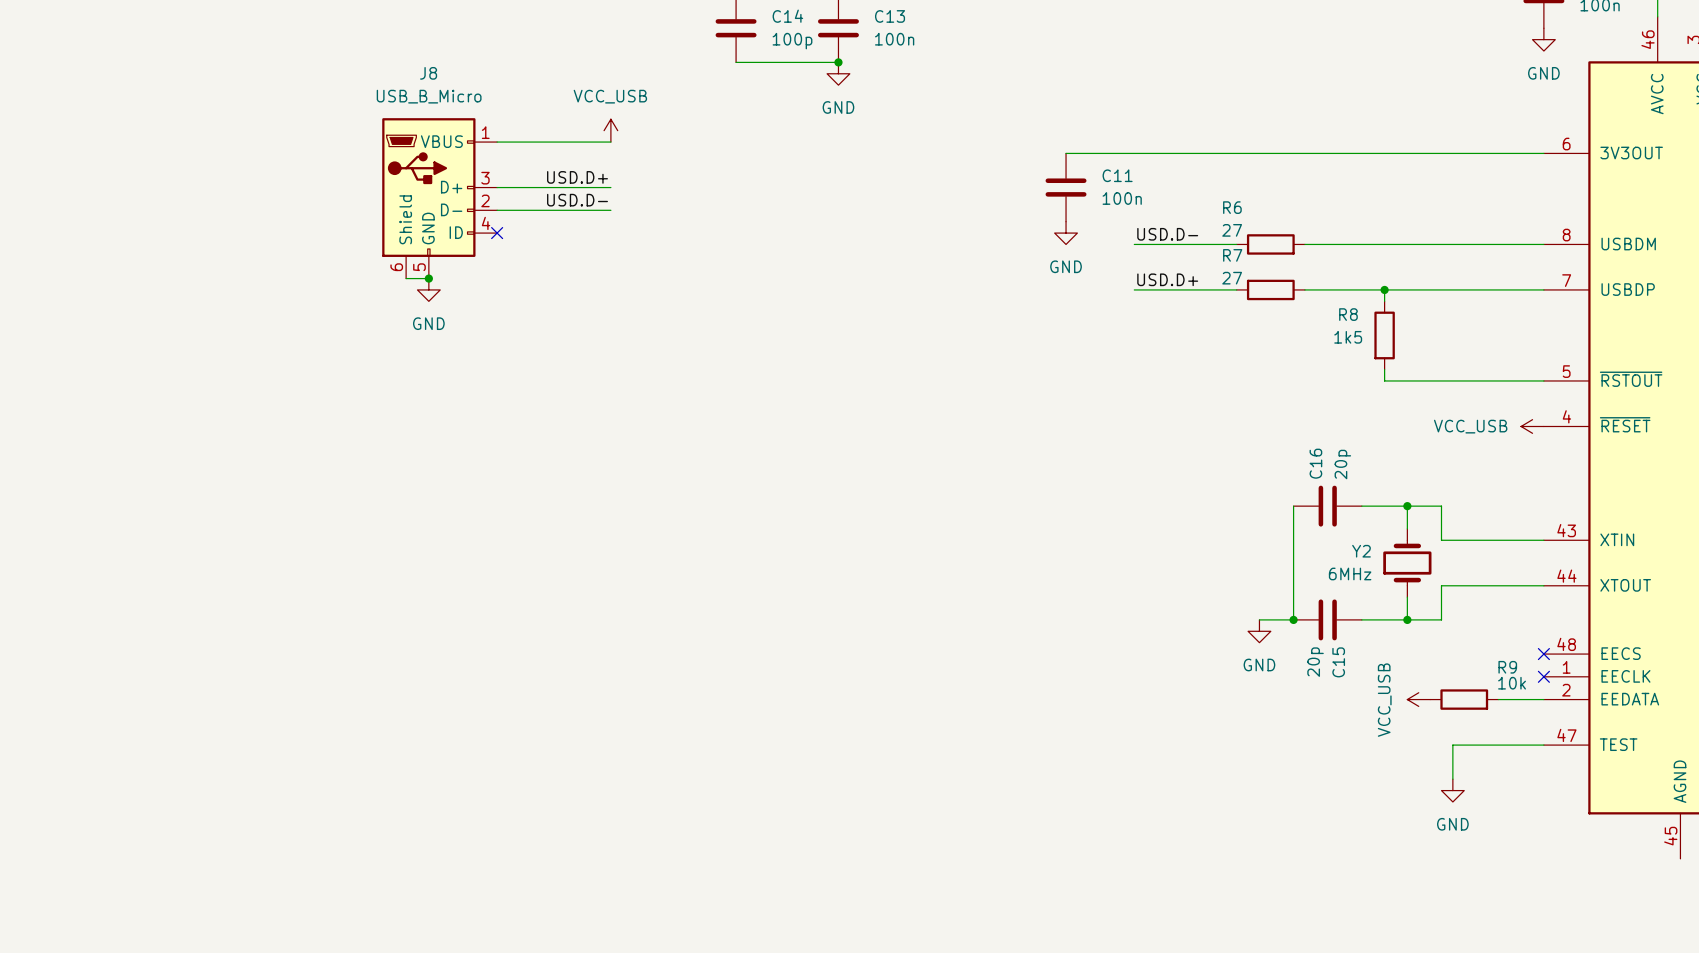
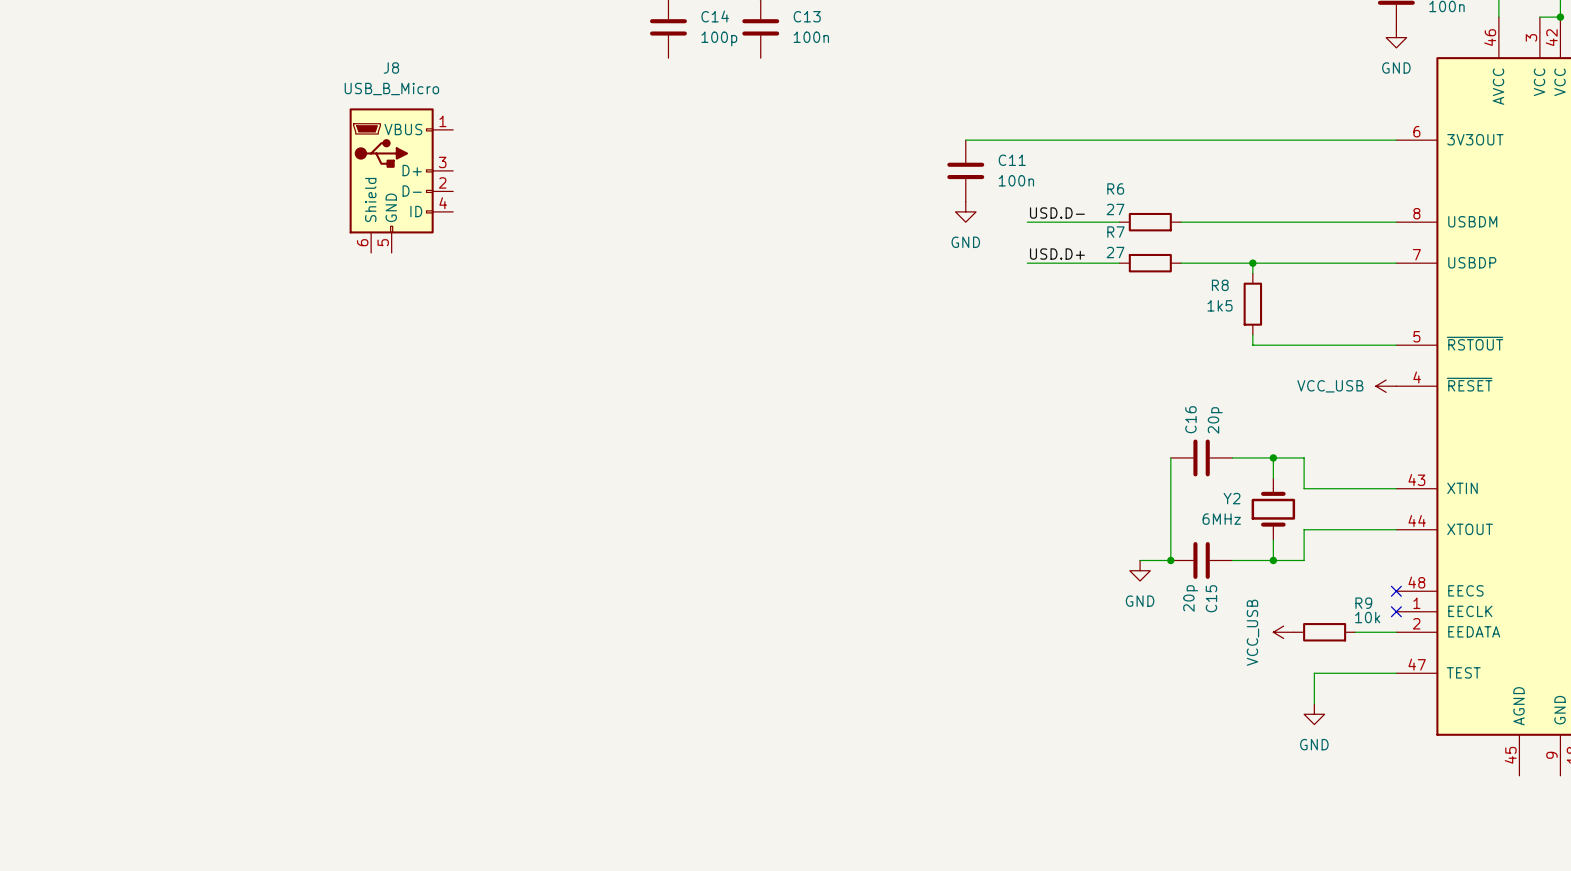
wire: (736, 62) (838, 62) -> none
junction: (838, 62) -> none
power symbol: GND (838, 73) -> none
power symbol: VCC_USB (610, 130) -> none
wire: (497, 142) (610, 142) -> none
label: USD.D+ (577, 177) -> none
wire: (497, 187) (610, 187) -> none
label: USD.D- (577, 200) -> none
wire: (497, 210) (610, 210) -> none
no-connect mark: (497, 233) -> none
wire: (406, 278) (428, 278) -> none
junction: (428, 278) -> none
power symbol: GND (428, 289) -> none

